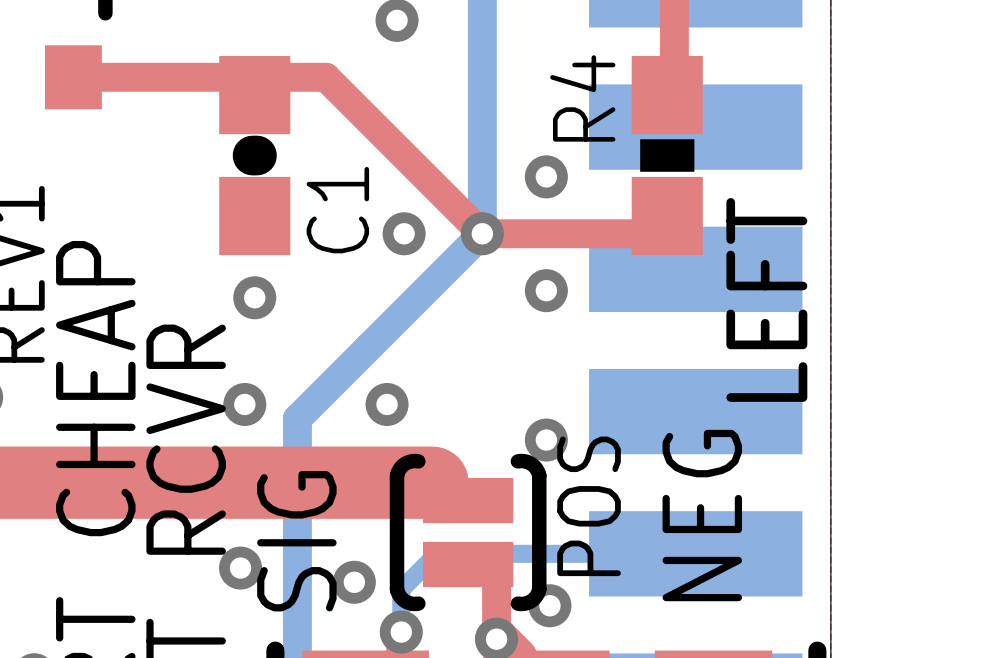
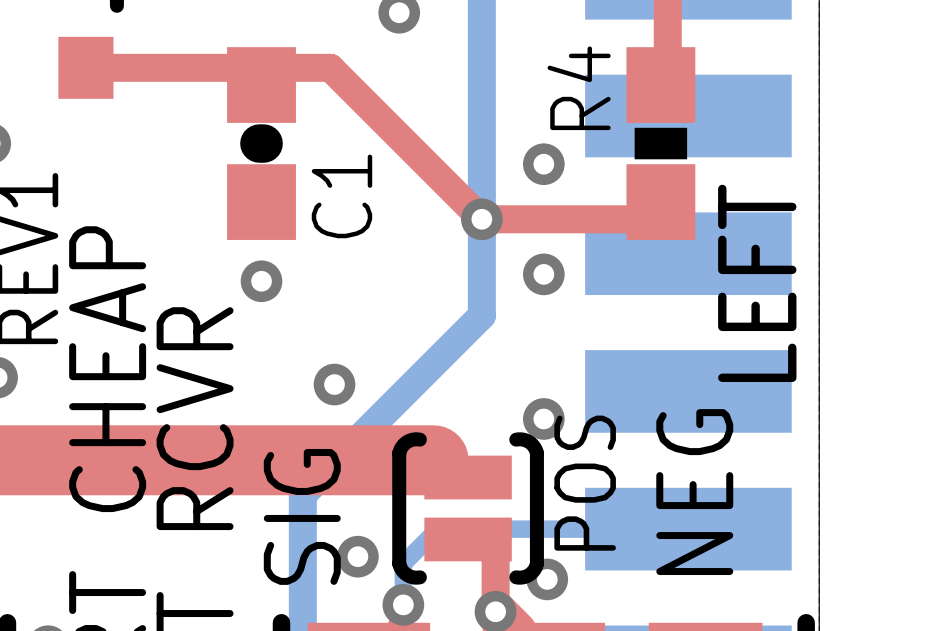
via: (404, 233) -> none
bottom track: (482, 233) (297, 418) (297, 518) -> (481, 219) (481, 315) (302, 494)
via: (244, 404) -> none
via: none -> (334, 384)
via: (387, 404) -> none
via: (240, 568) -> none

